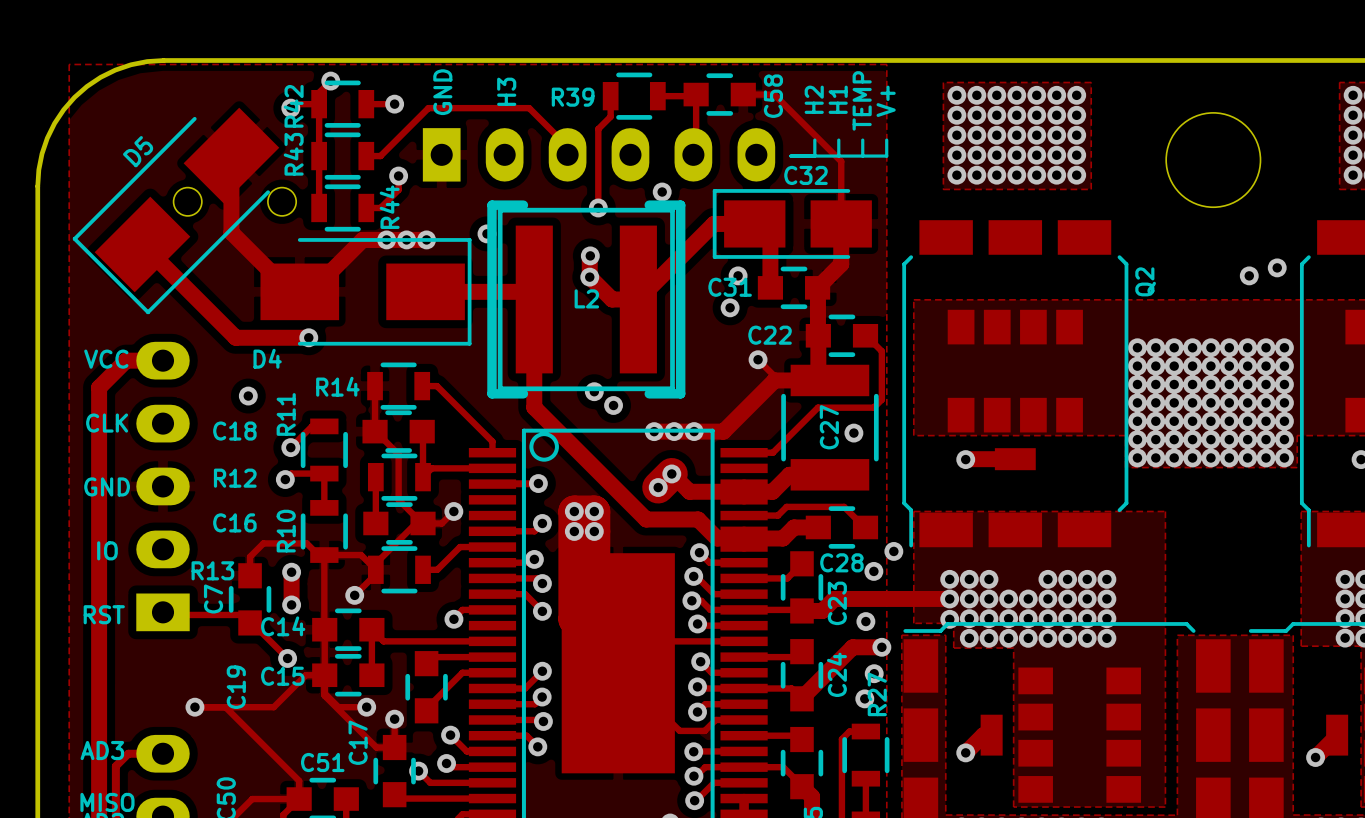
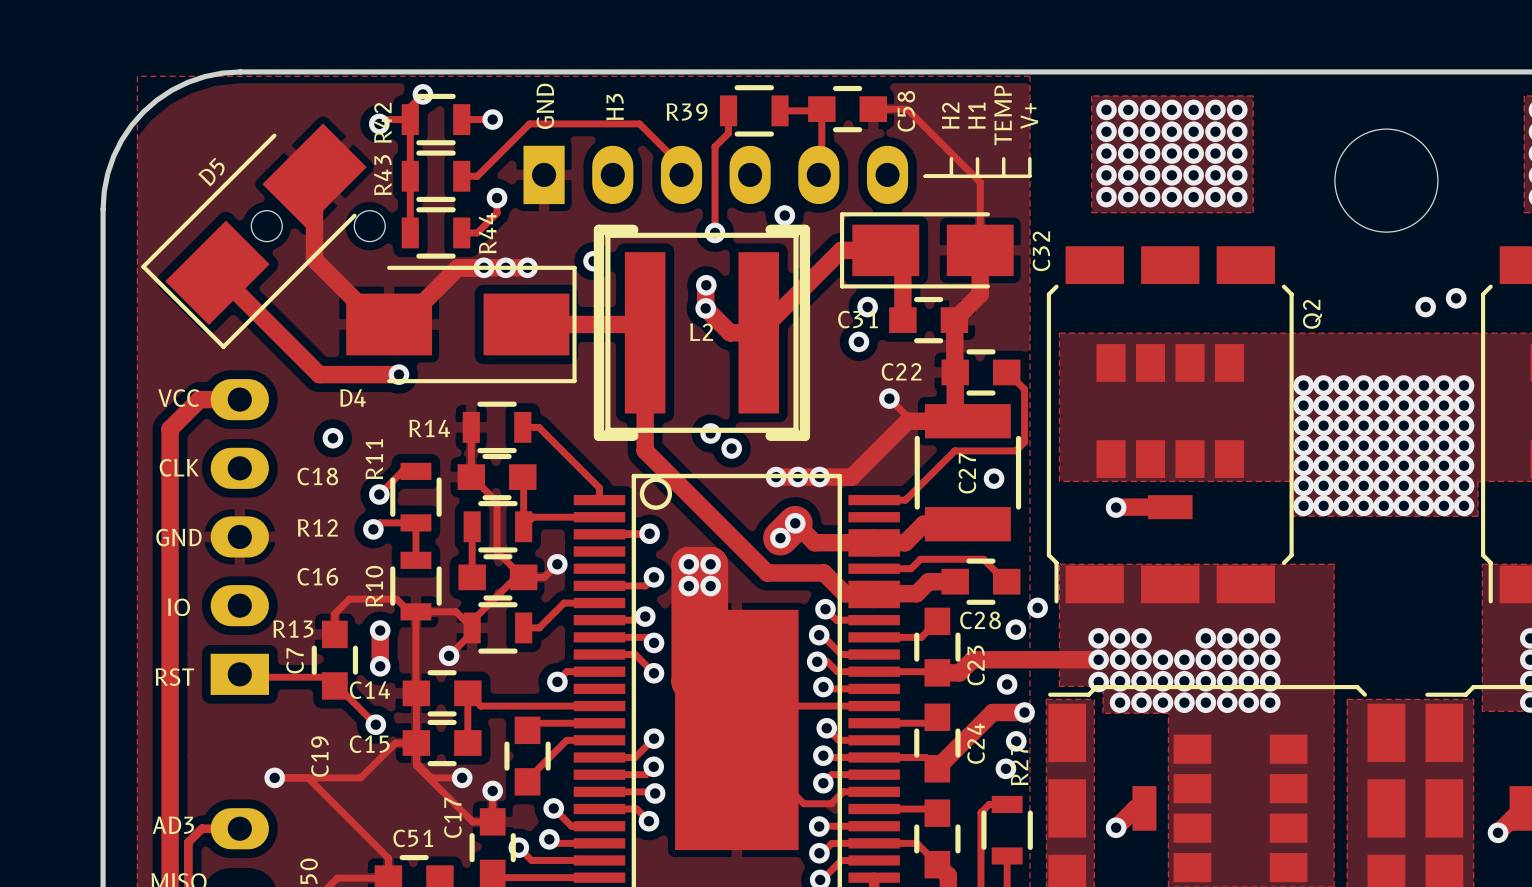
C32 name rotation: 0° (805, 175) -> 90° counterclockwise (1041, 251)
C32 name position: C32 (805, 175) -> C32 (1041, 251)

